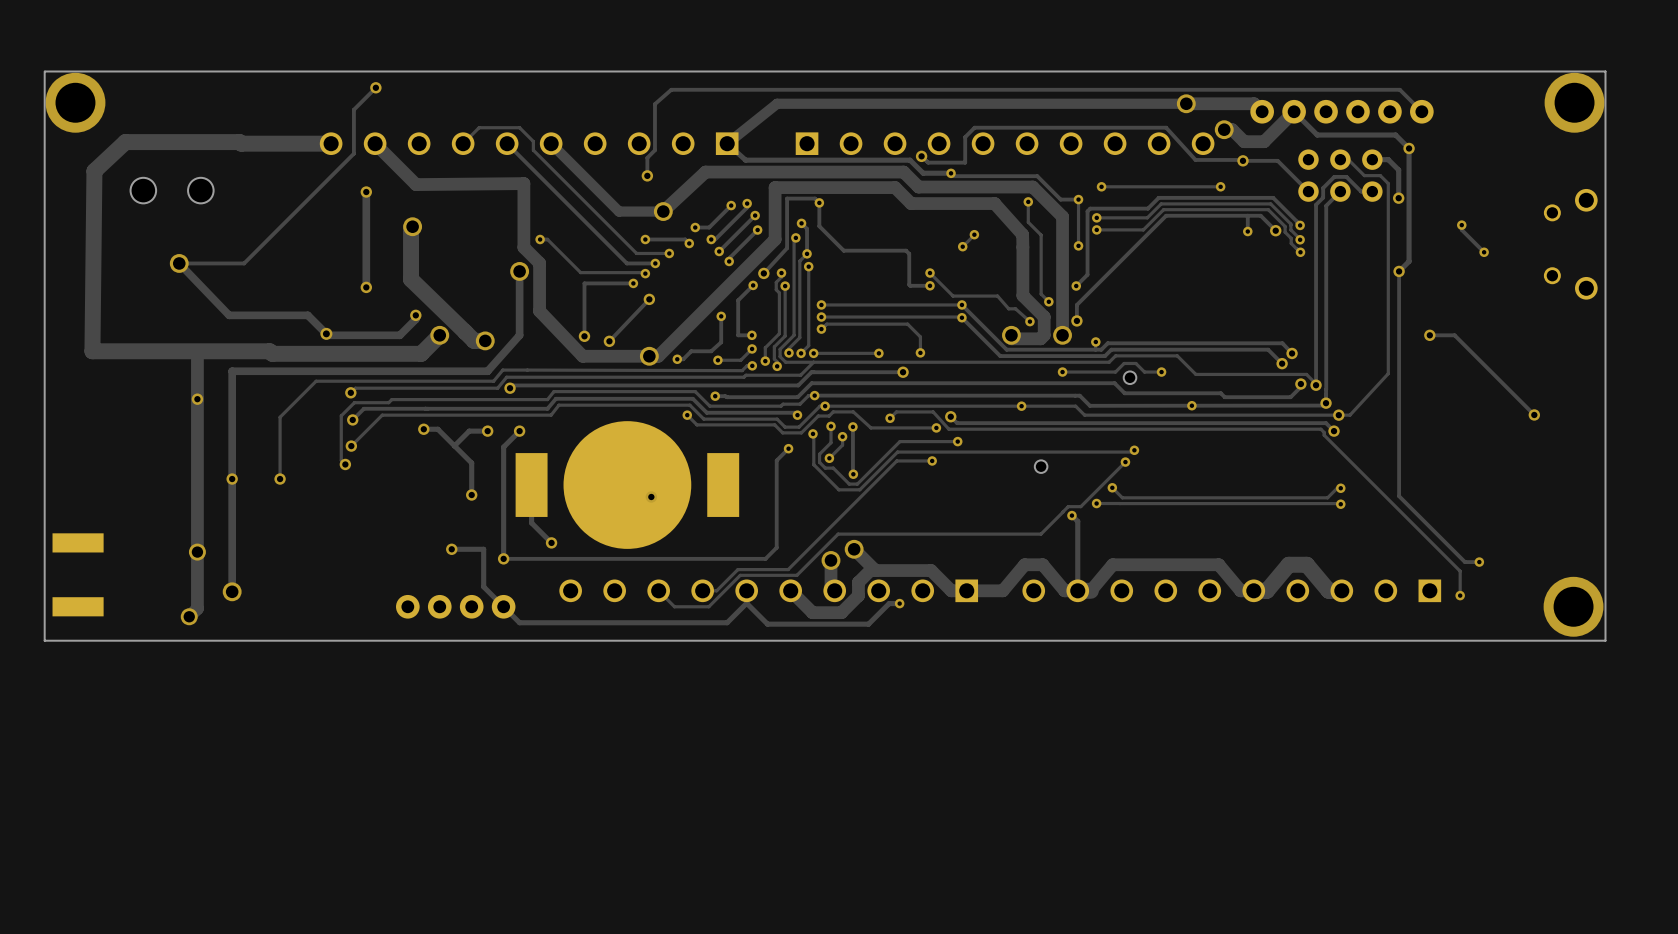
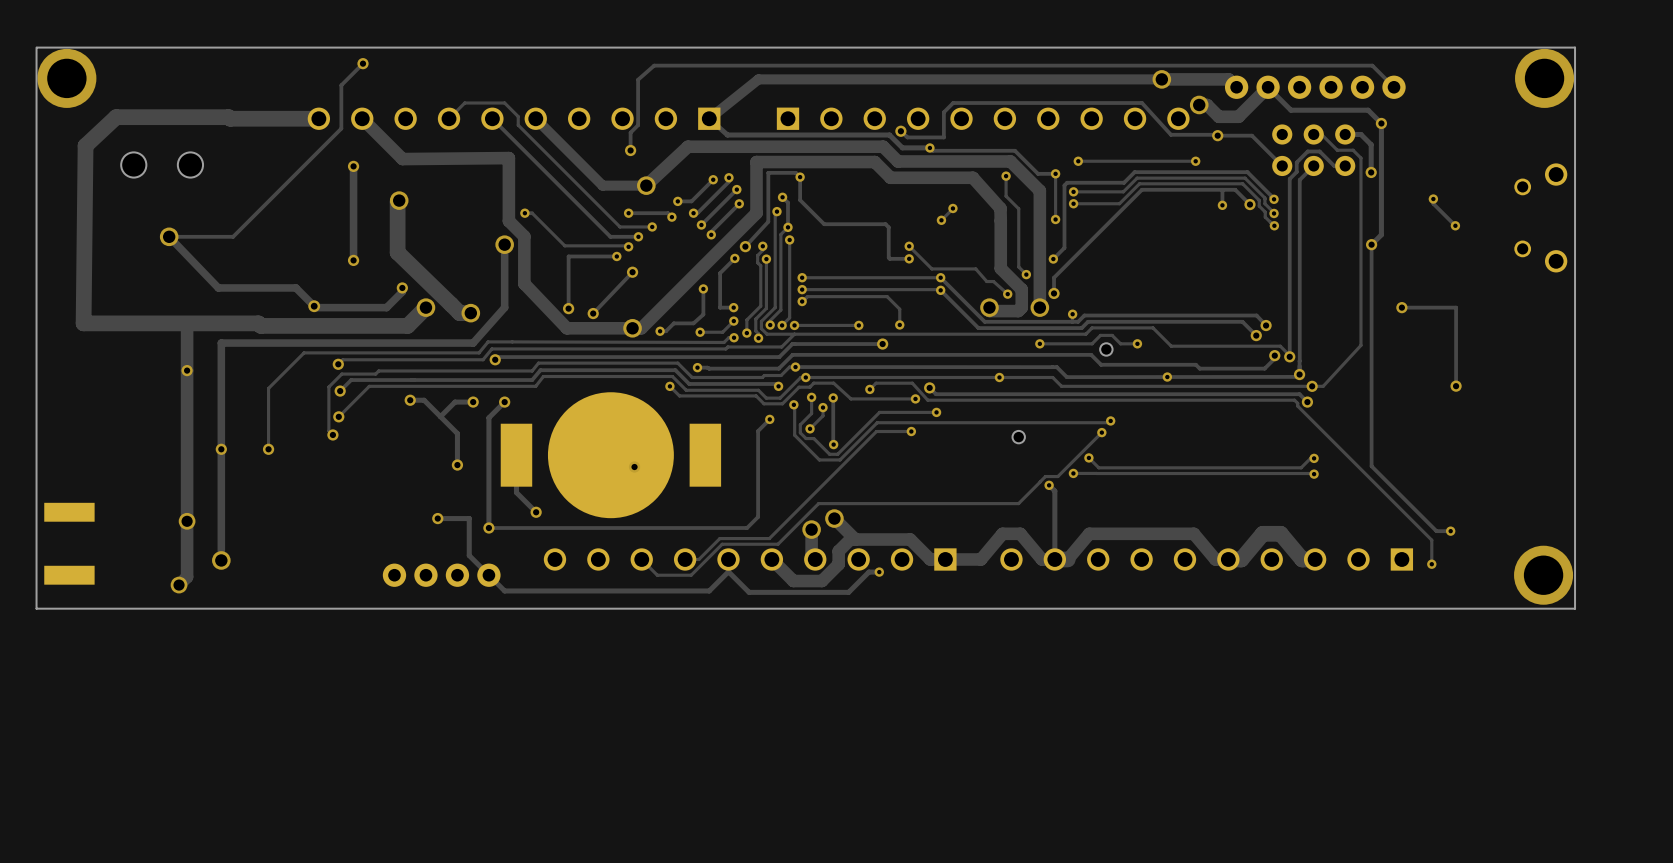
track: (1454, 335) (1534, 414) -> (1426, 307) (1456, 307) (1456, 386)
via position: (1534, 414) -> (1456, 386)

